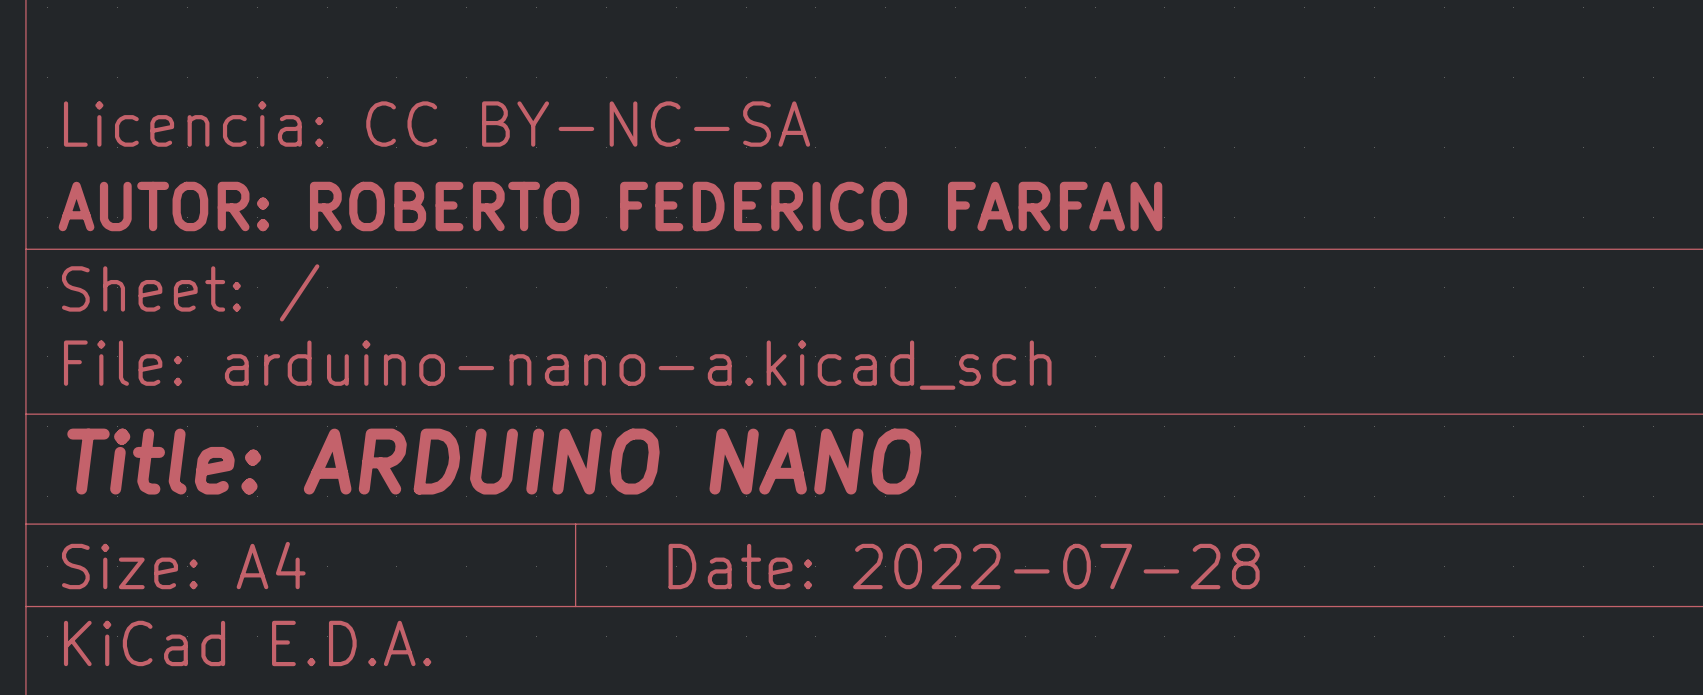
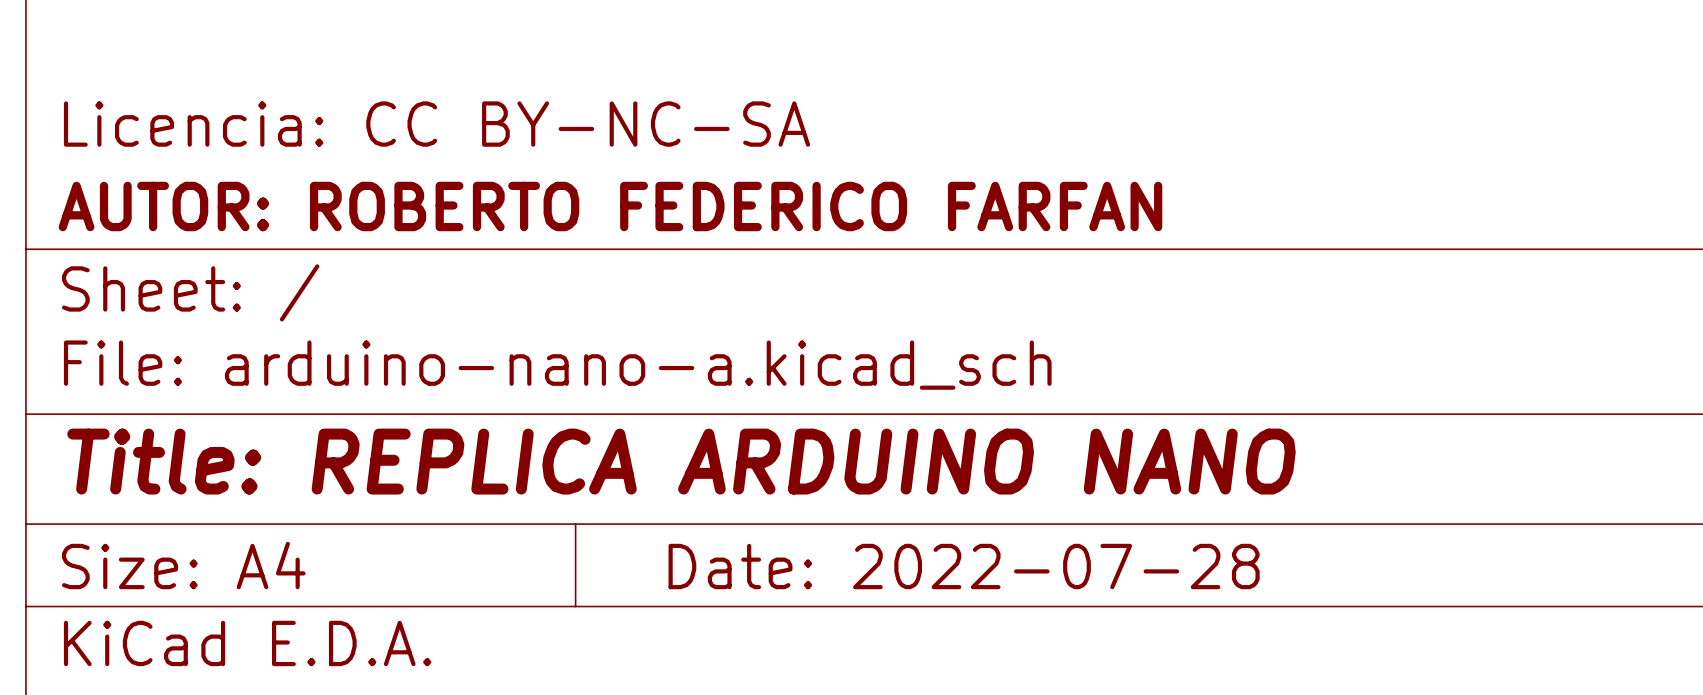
title block: Title: ARDUINO NANO (494, 461) -> Title: REPLICA ARDUINO NANO (681, 461)

